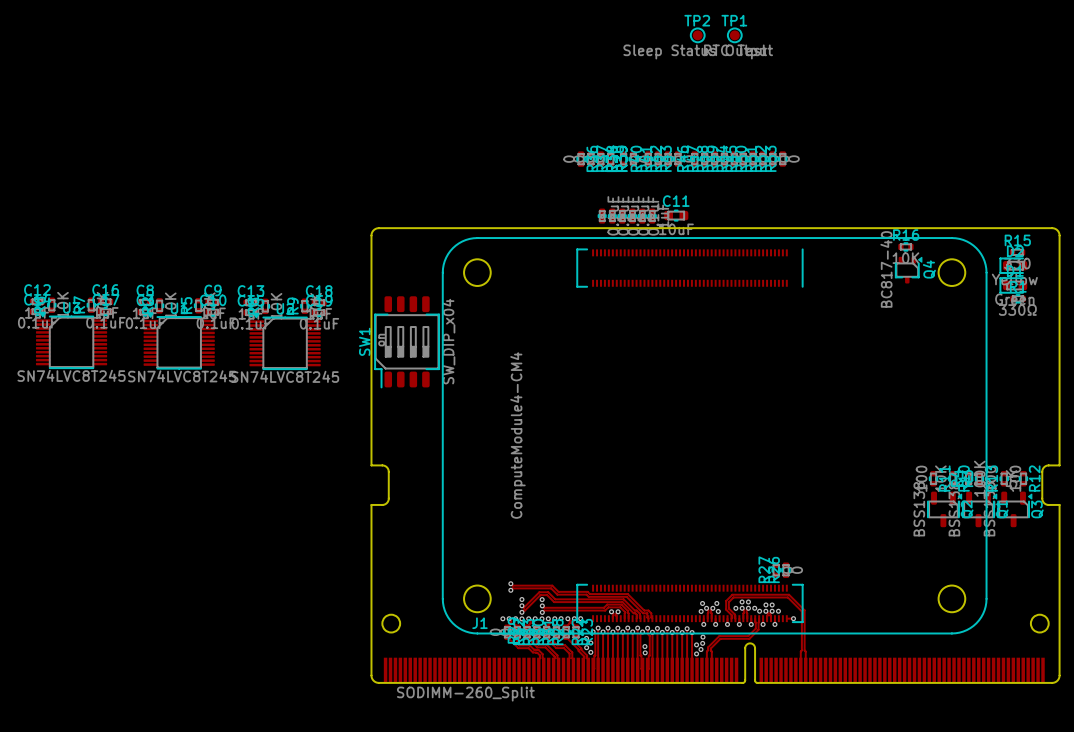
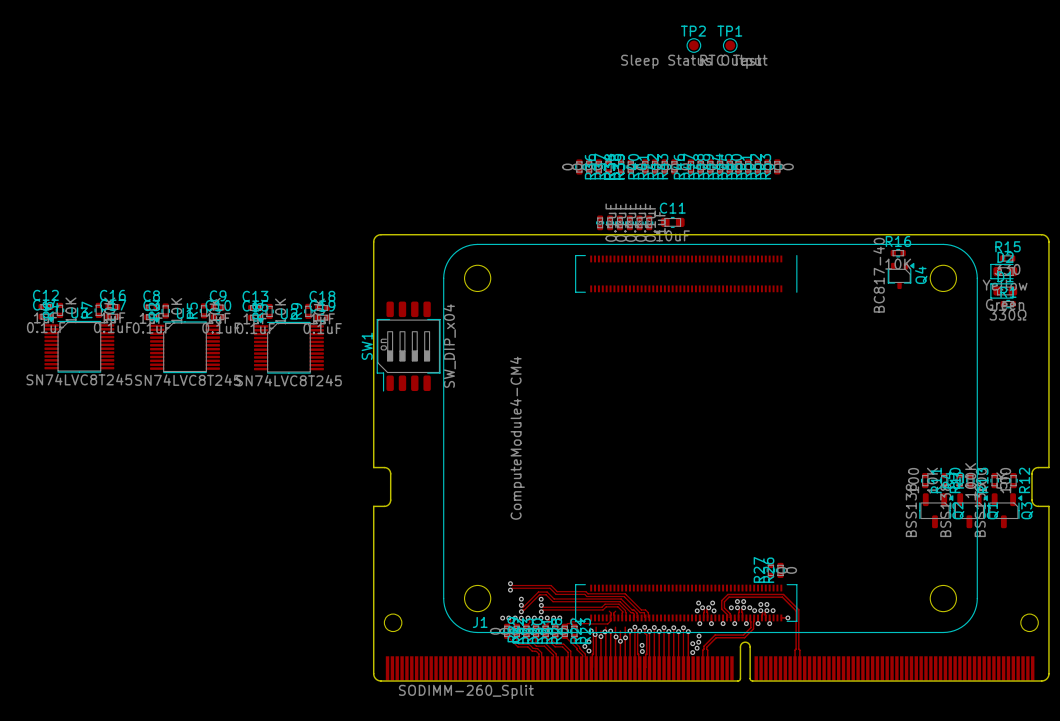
via: (611, 611) -> none
via: (618, 611) -> none
track: (567, 618) (569, 623) (566, 627) -> (610, 617) (611, 620) (607, 623) (571, 621) (564, 626)
via: (567, 618) -> none
via: (574, 618) -> none
via: (580, 618) -> none
via: (598, 628) -> none
via: (608, 628) -> none
via: (617, 628) -> none
via: (627, 628) -> none
via: (603, 631) -> none
via: (622, 631) -> none
via: none -> (604, 631)
via: none -> (595, 634)
via: none -> (600, 636)
via: (586, 638) -> none
via: none -> (616, 636)
via: none -> (625, 637)
via: none -> (620, 641)

